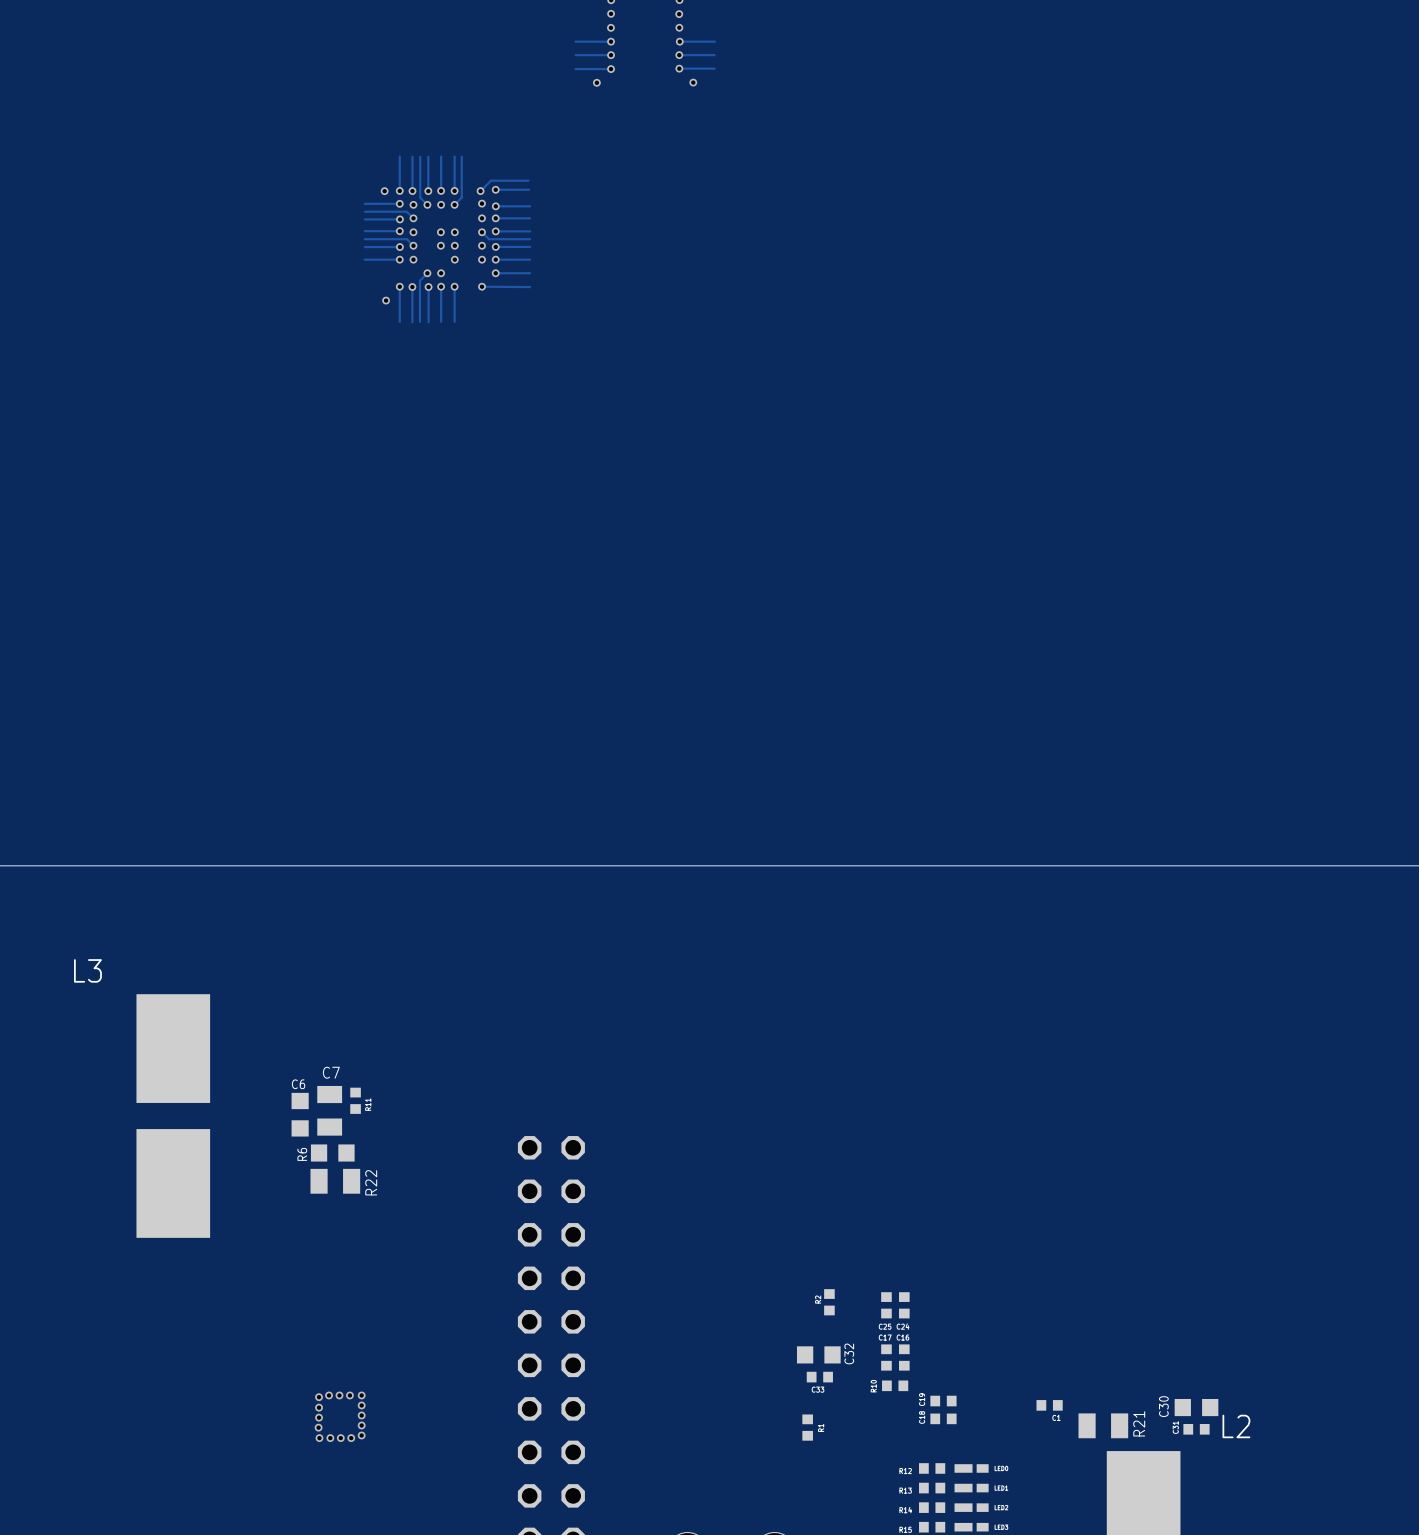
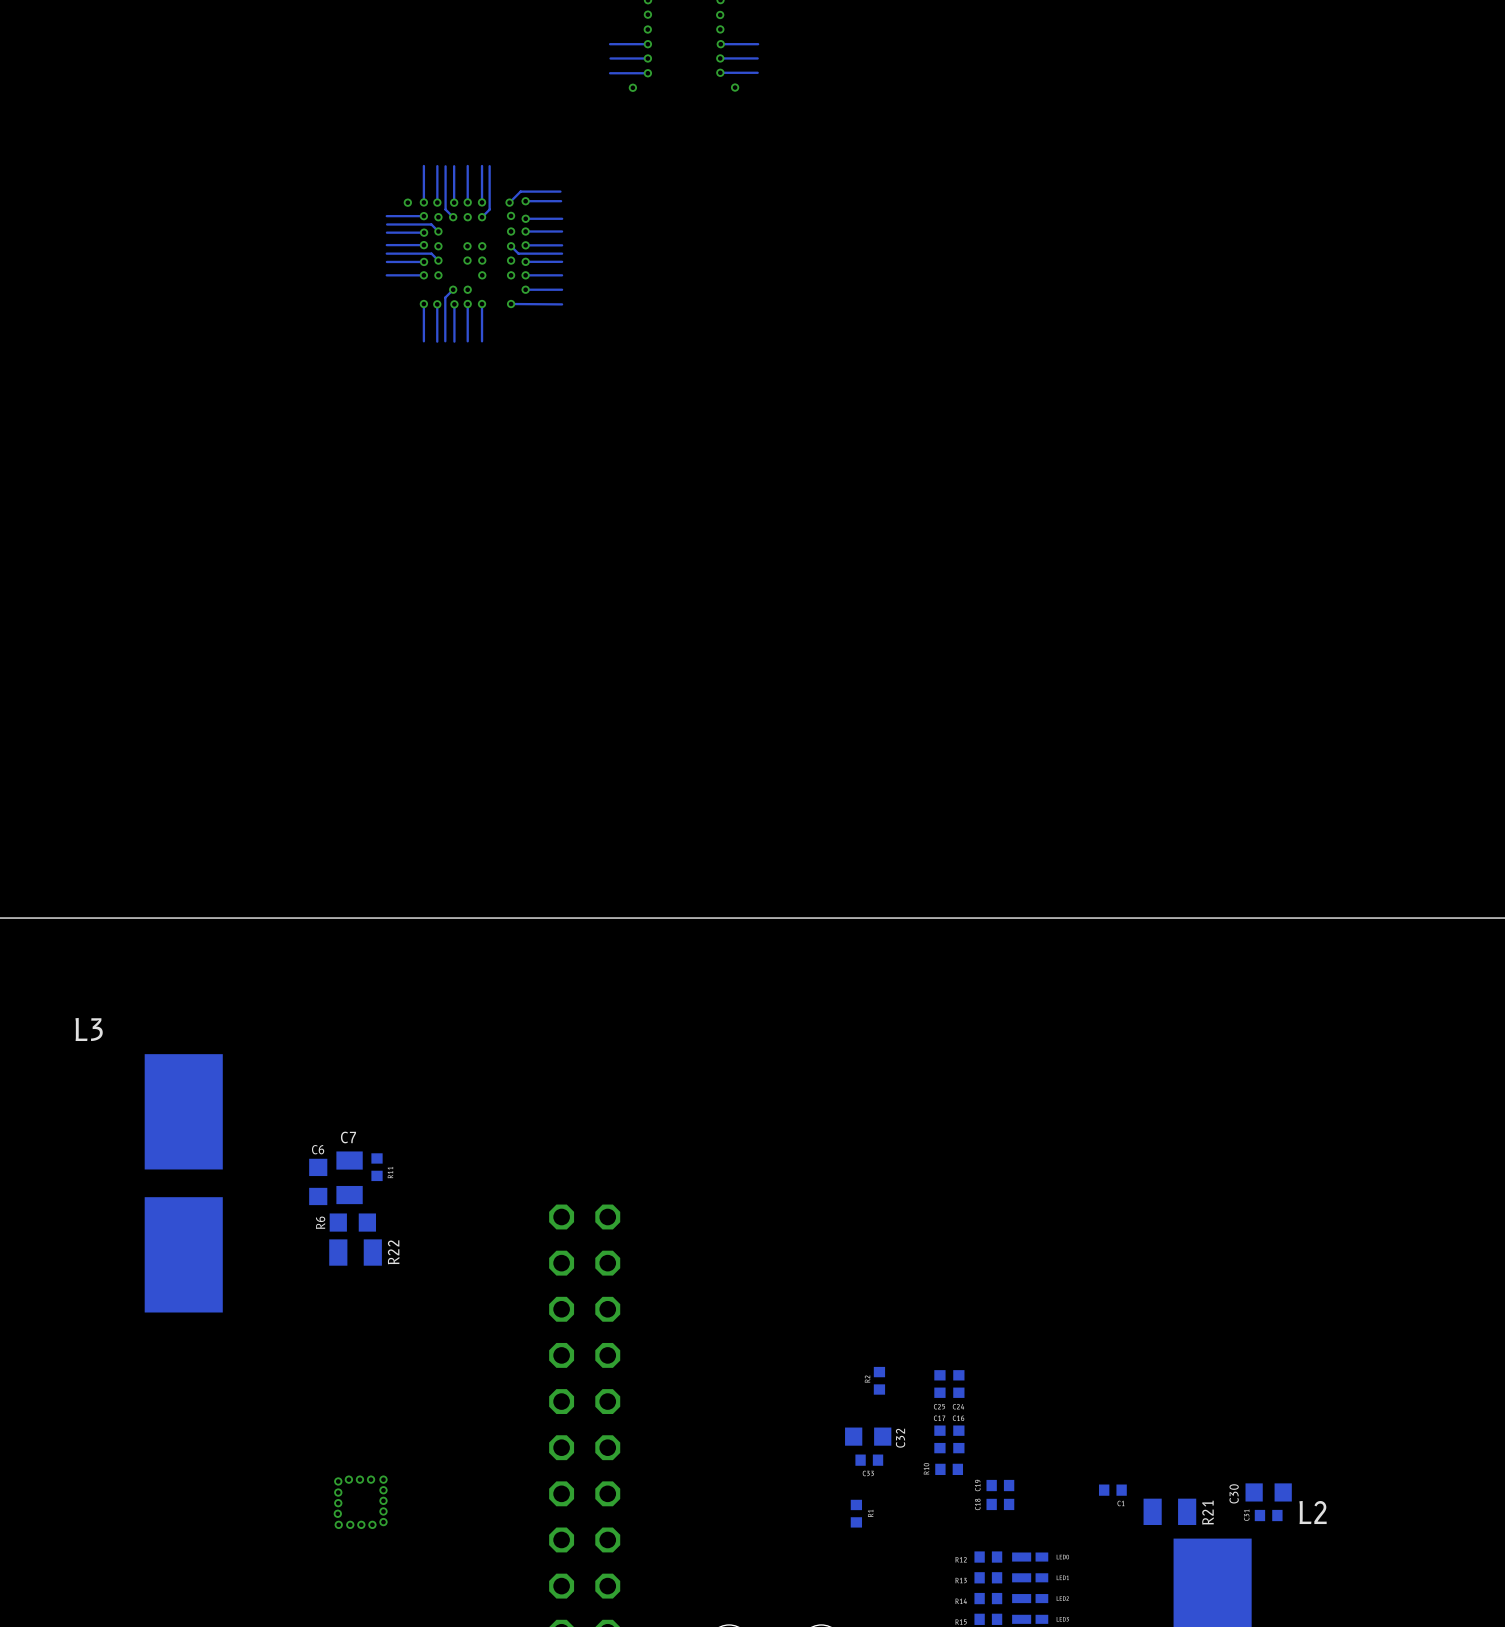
via: (386, 300) -> none

